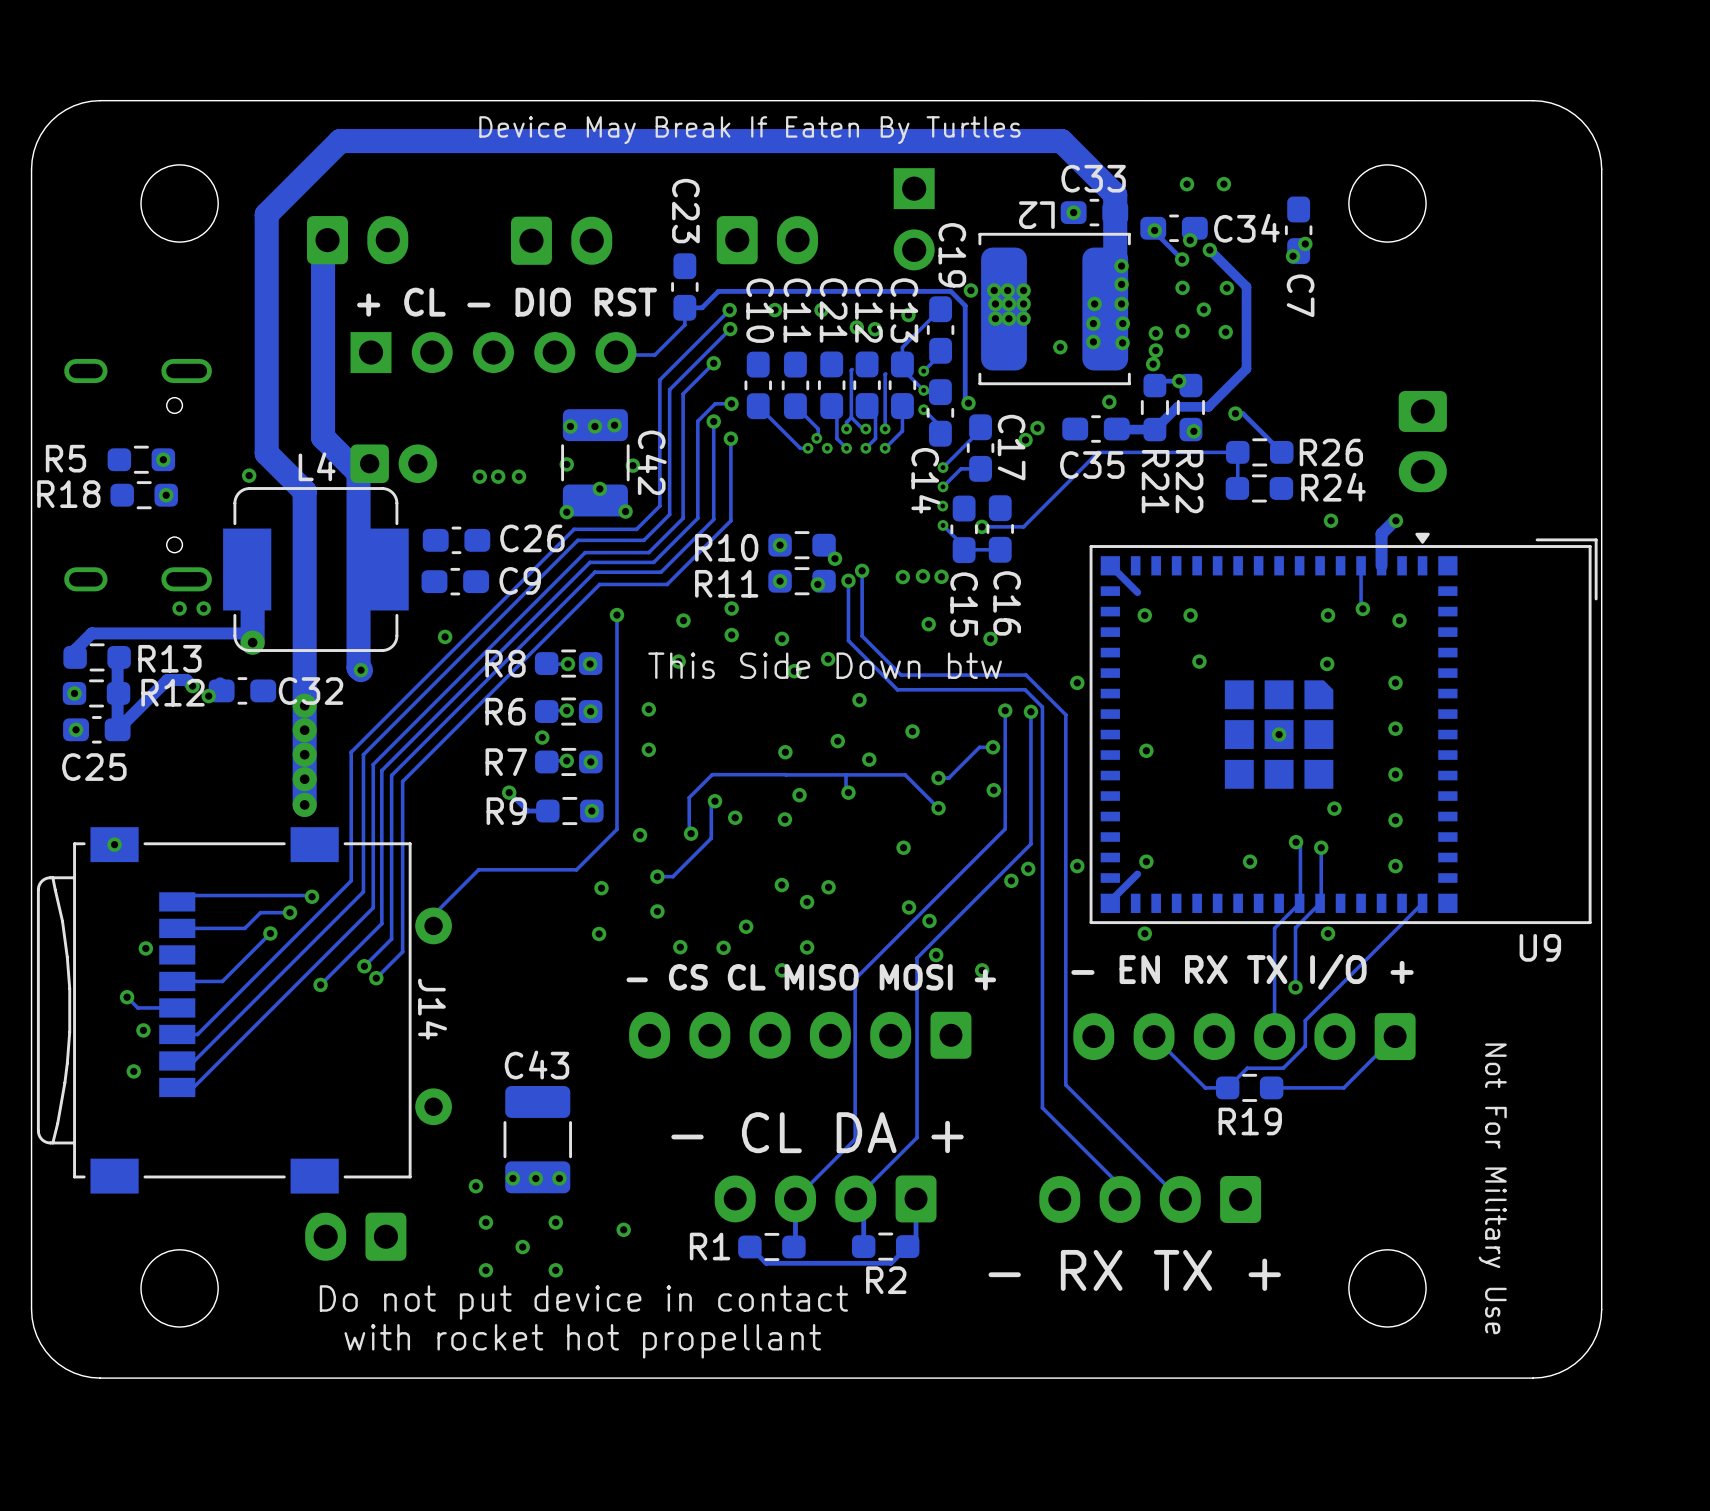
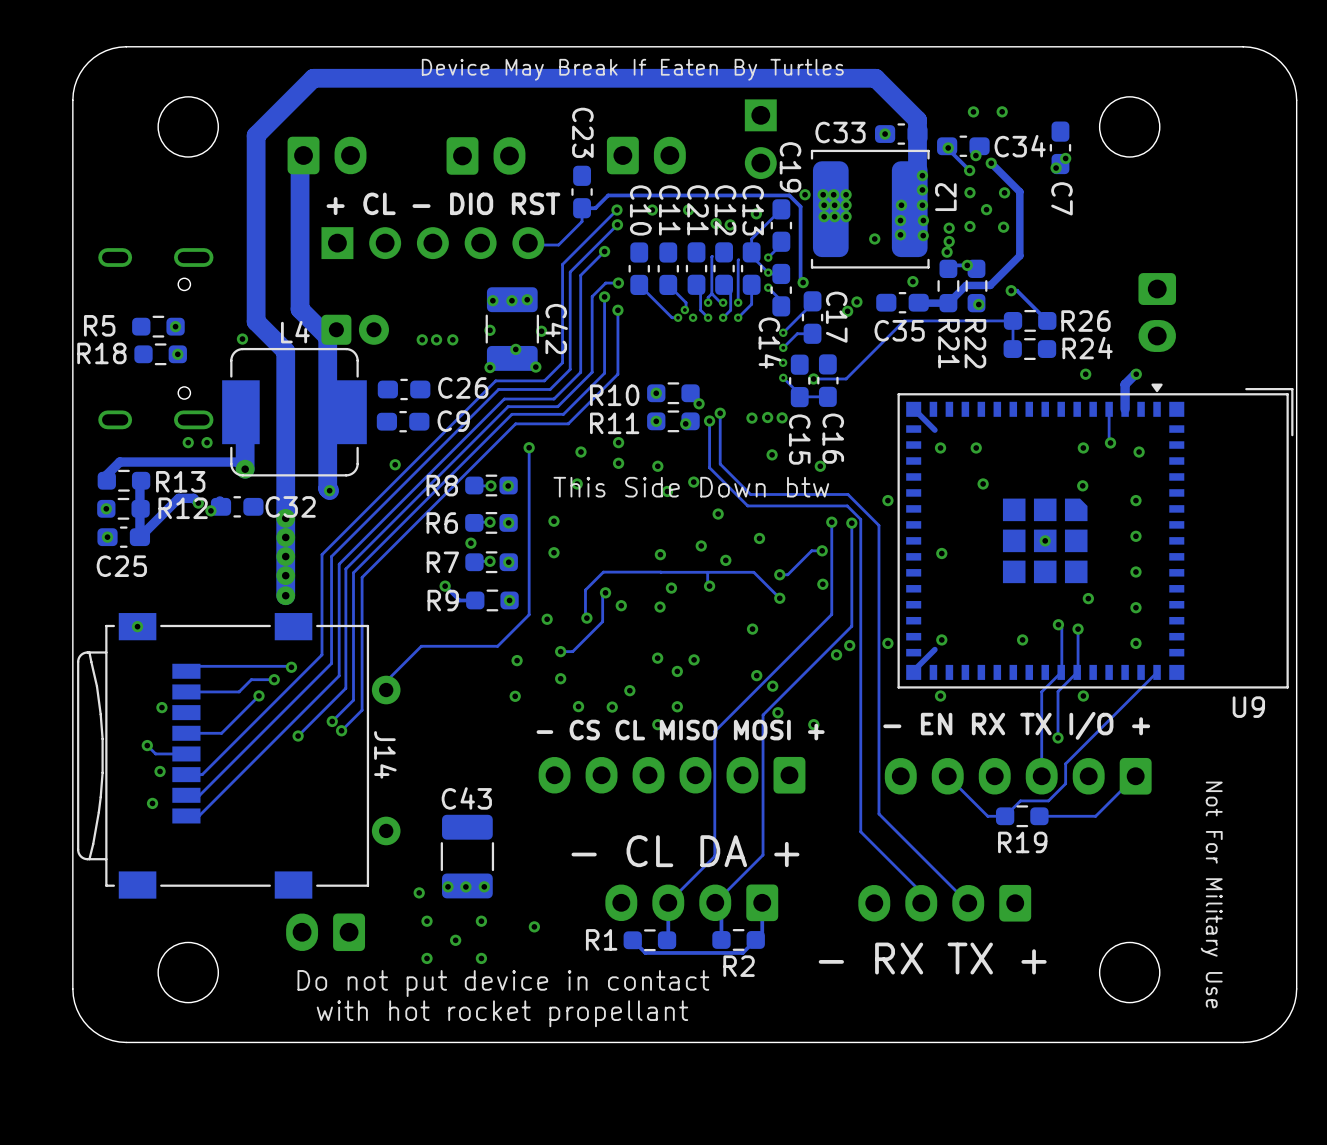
C33 name position: C33 (1093, 178) -> C33 (840, 132)
L2 name rotation: 0° (1036, 215) -> 90° clockwise (945, 197)
L2 name position: L2 (1036, 215) -> L2 (945, 197)
text: with rocket hot propellant (582, 1341) -> with hot rocket propellant (502, 1013)

